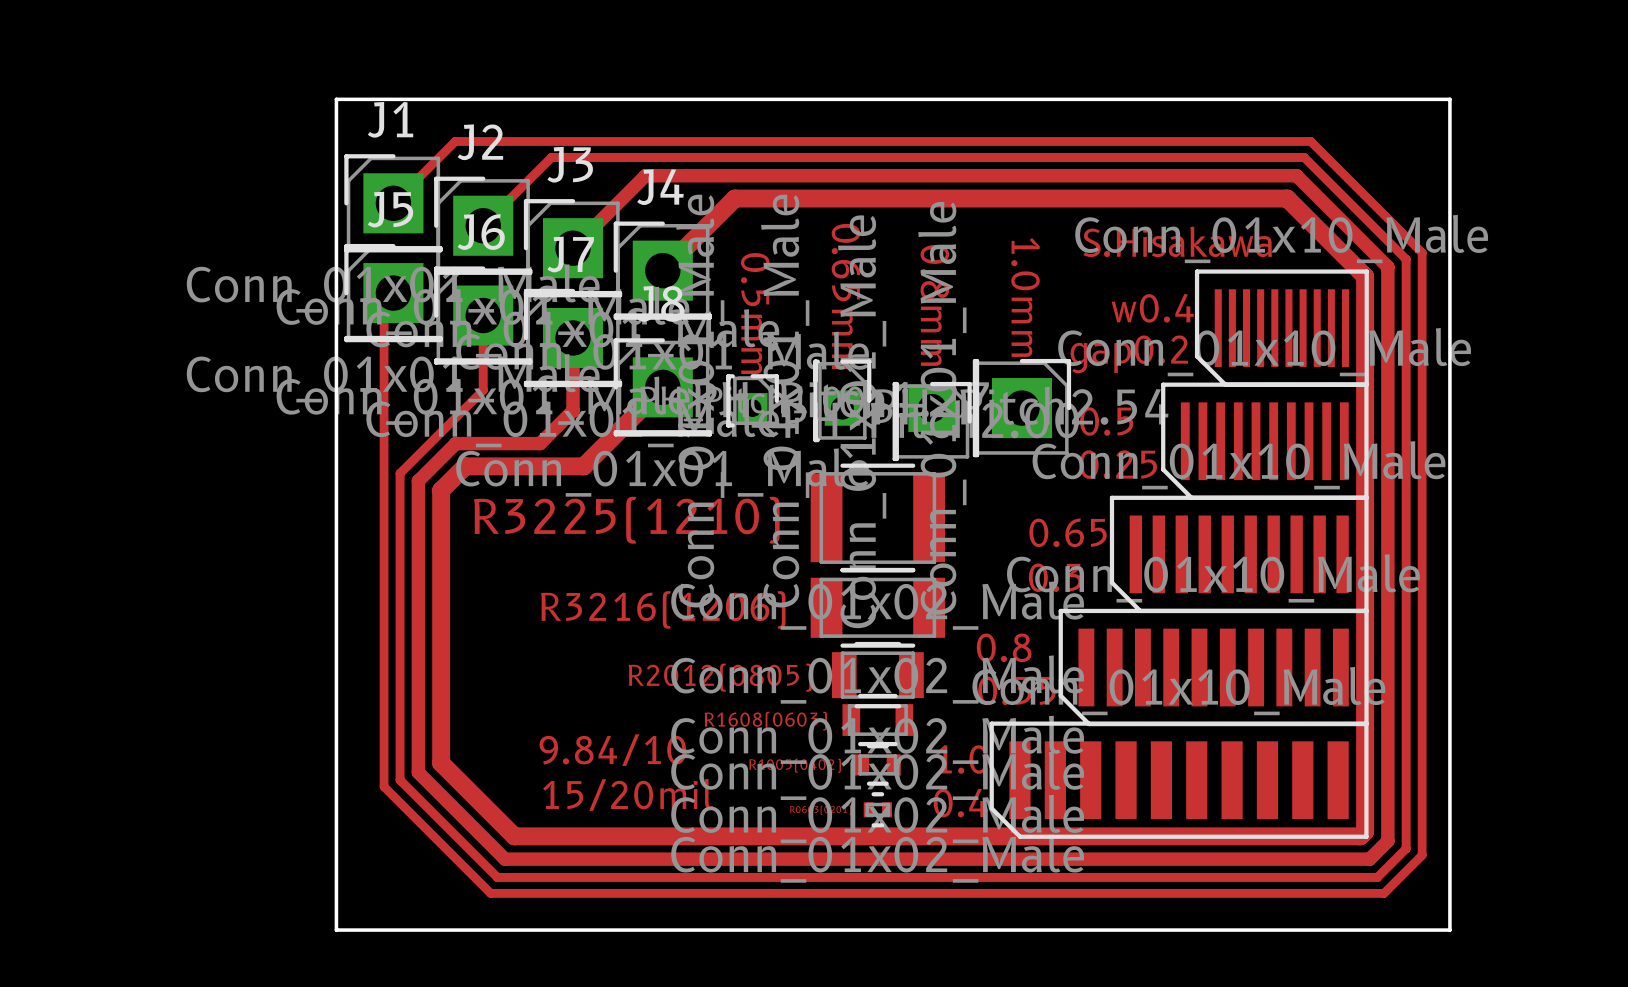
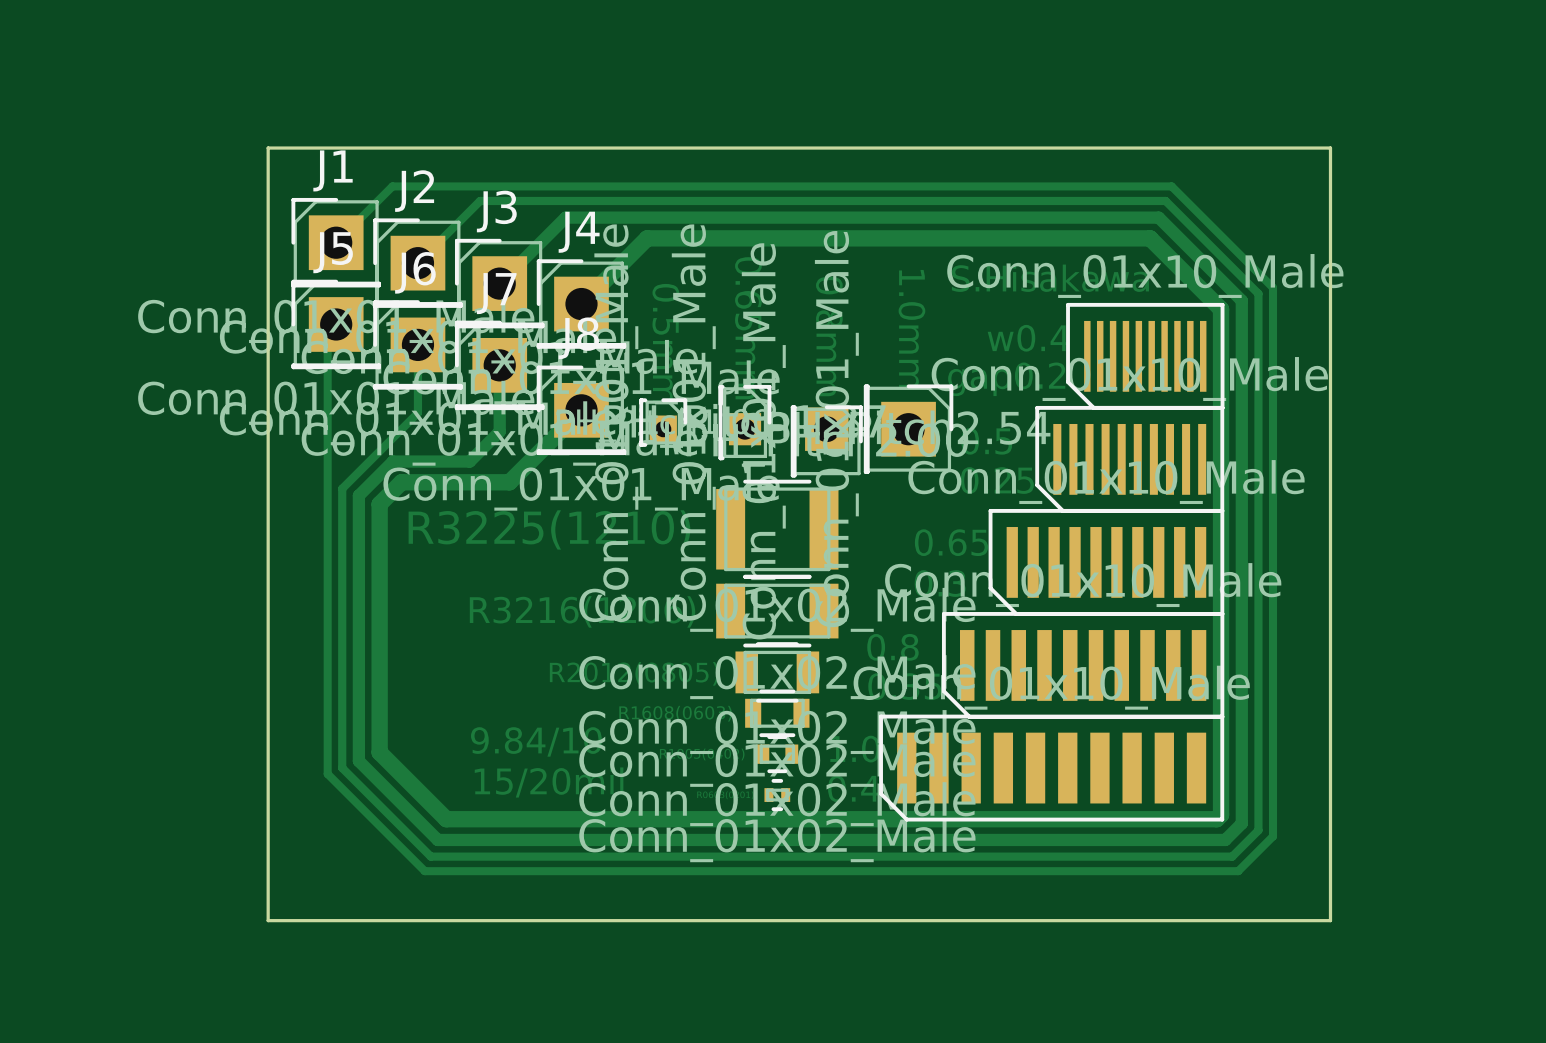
board edge: (336, 99) (336, 930) (1449, 930) (1449, 99) -> (284, 148) (268, 148) (268, 920) (1330, 920) (1330, 148) (1298, 148)

